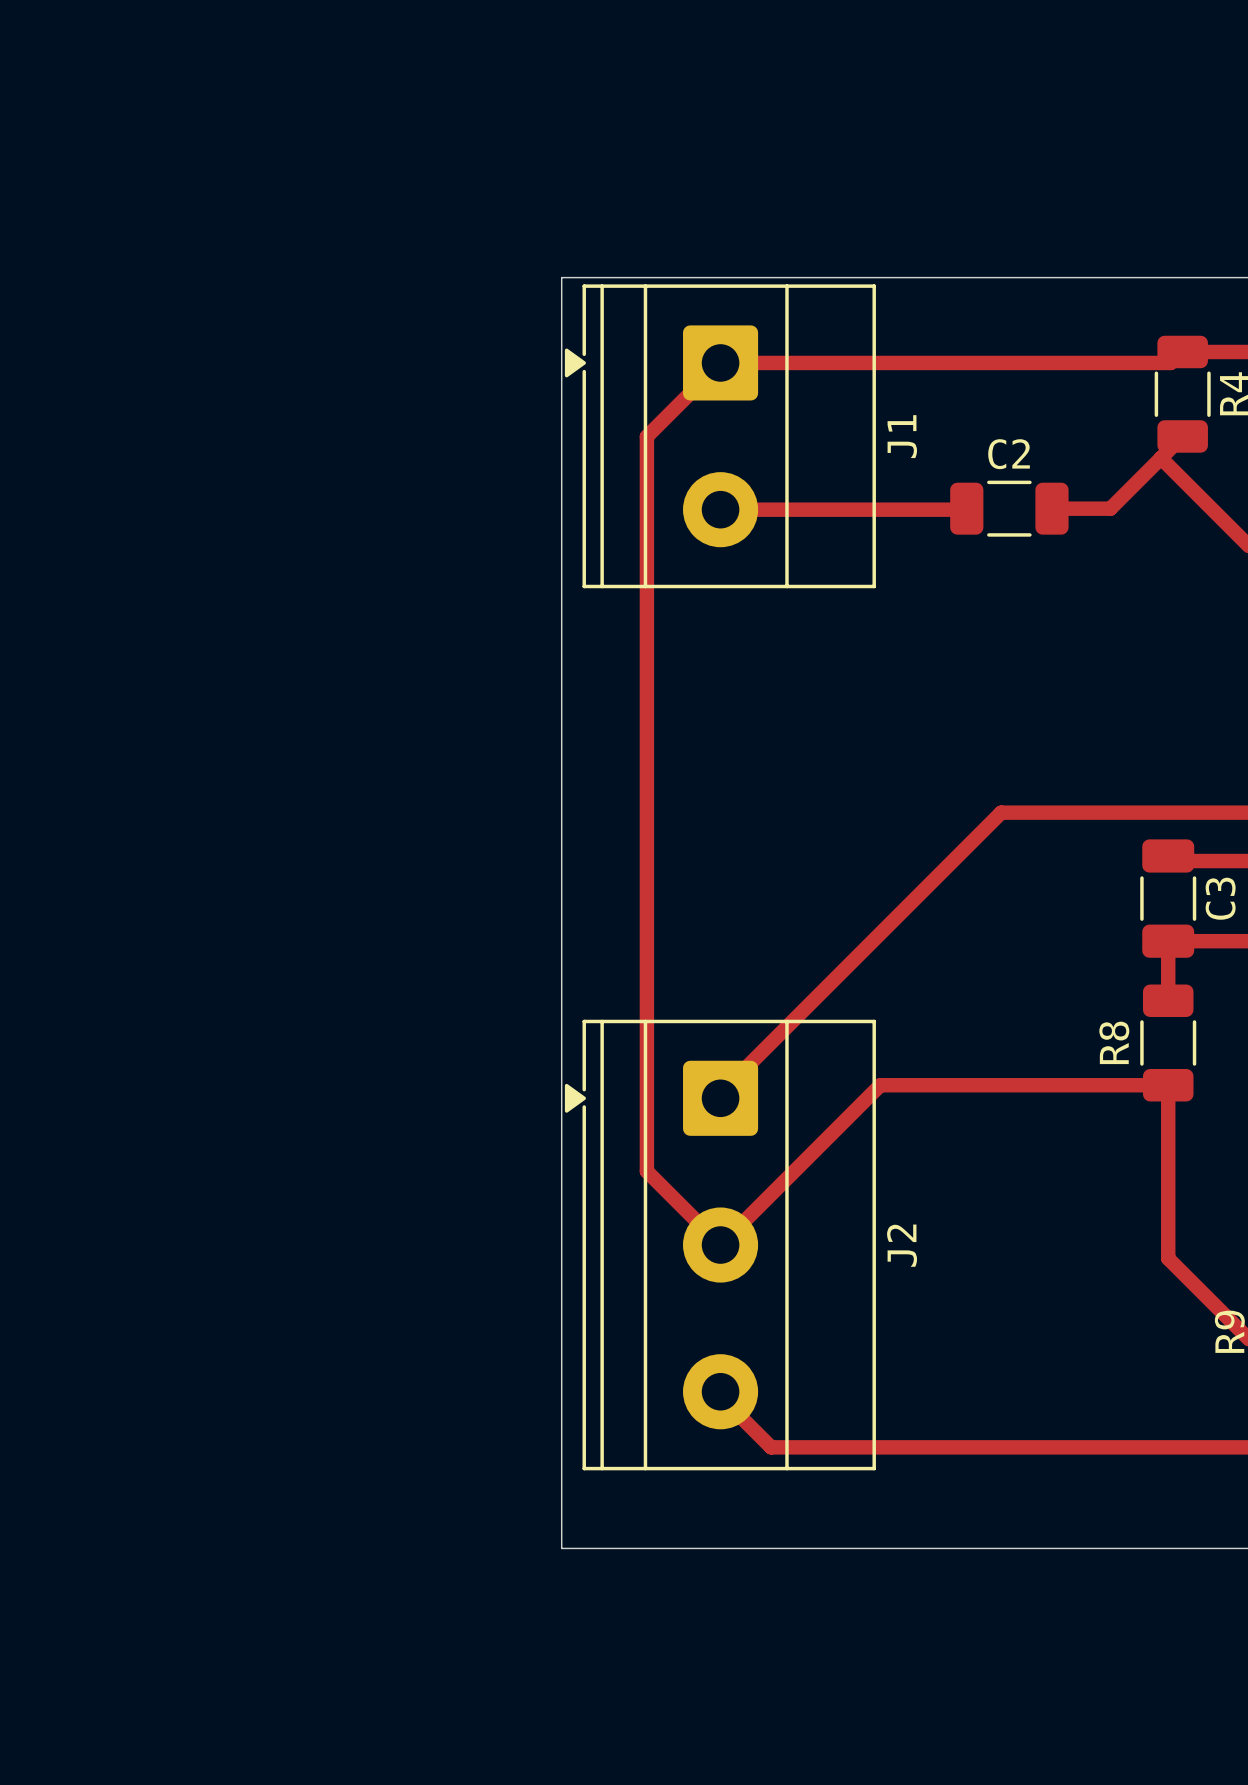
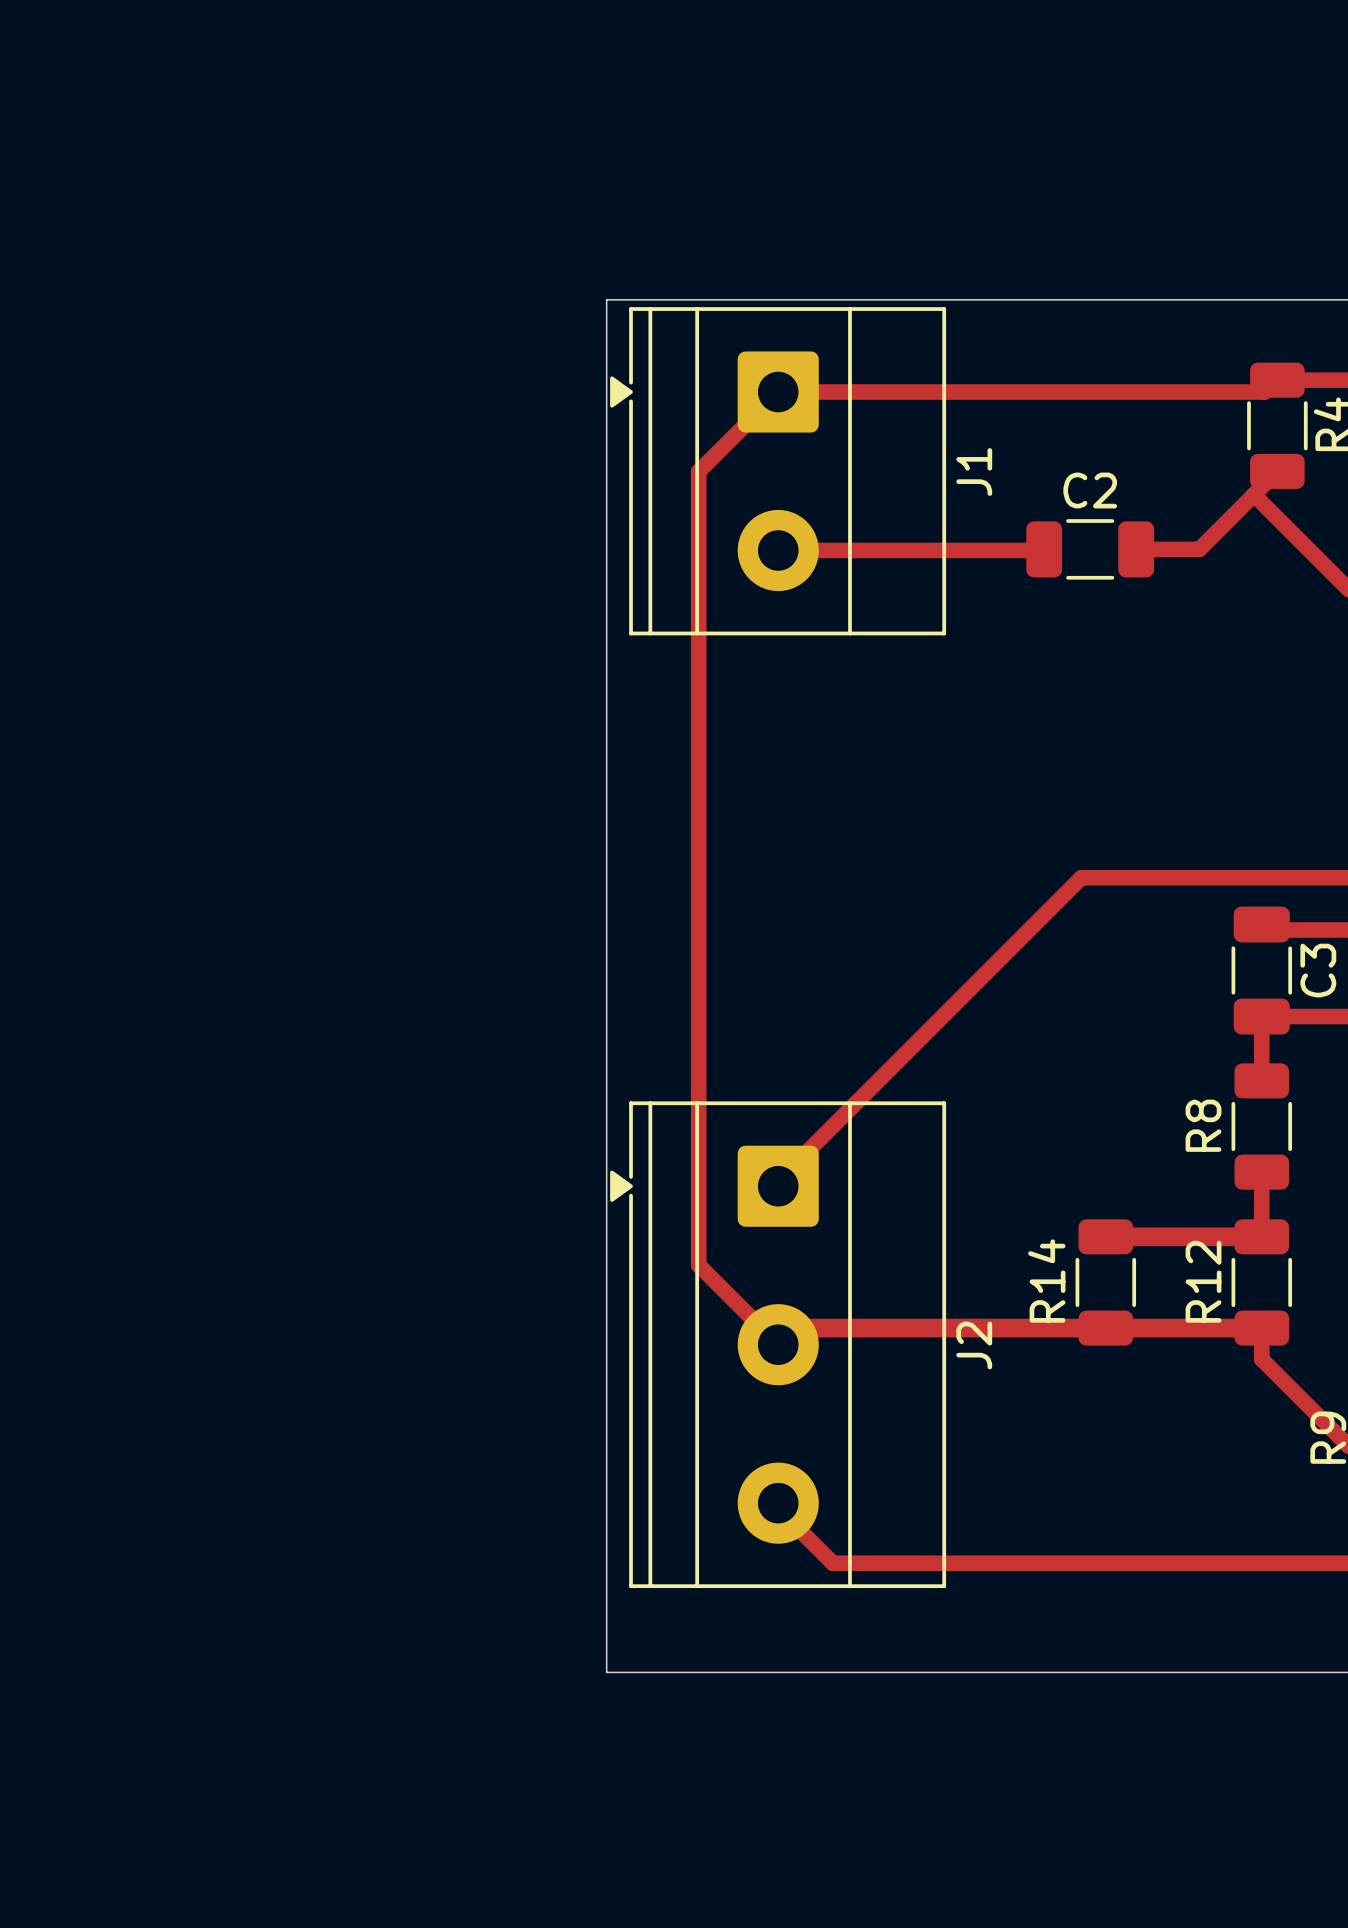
track: (1168, 1085) (880, 1085) (735, 1229) -> (1261, 1328) (794, 1328)
track: (1168, 1145) (1168, 1229) -> (1261, 1236) (1105, 1236)
R14: none -> (1105, 1282)
R12: none -> (1261, 1282)

